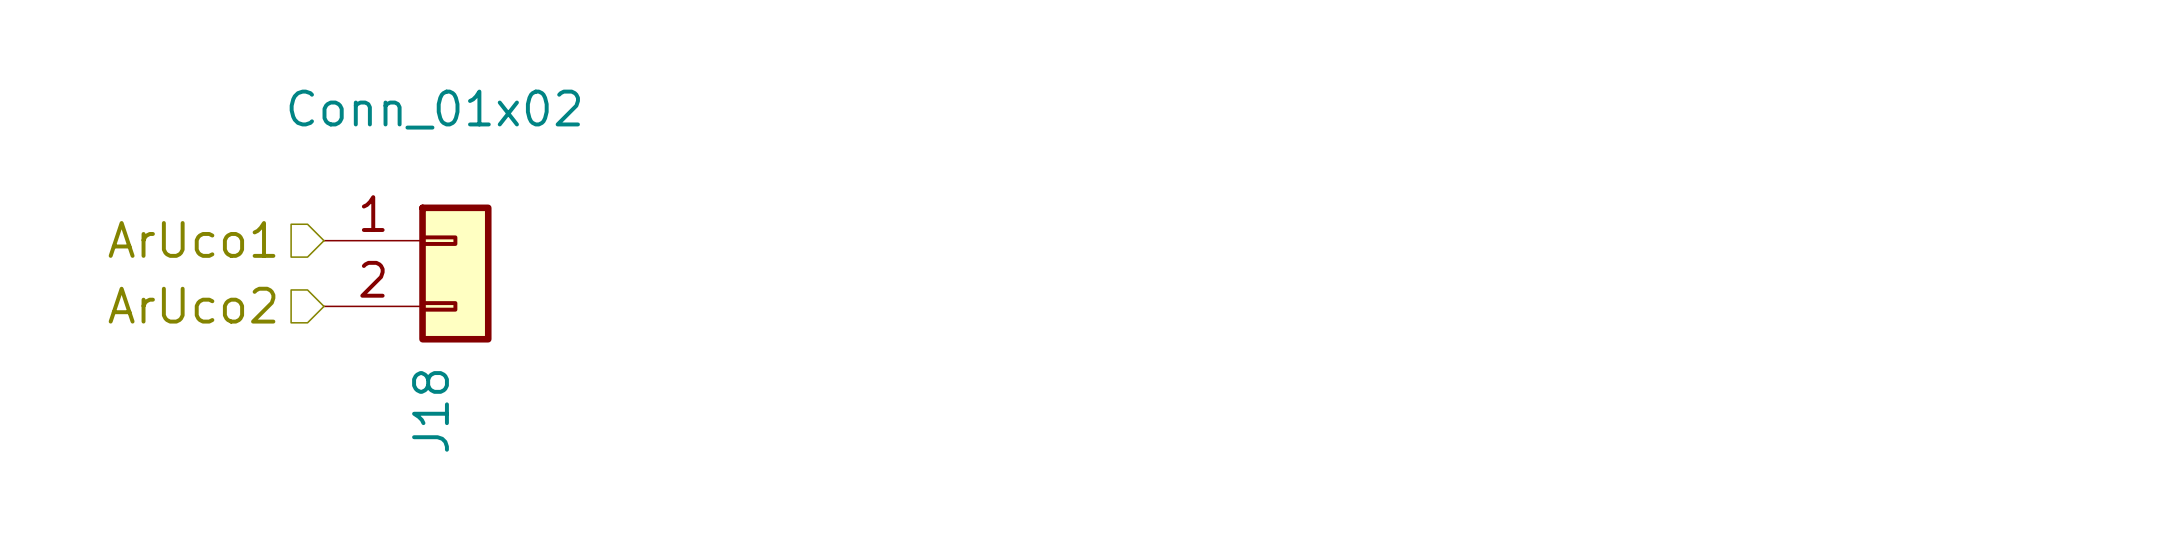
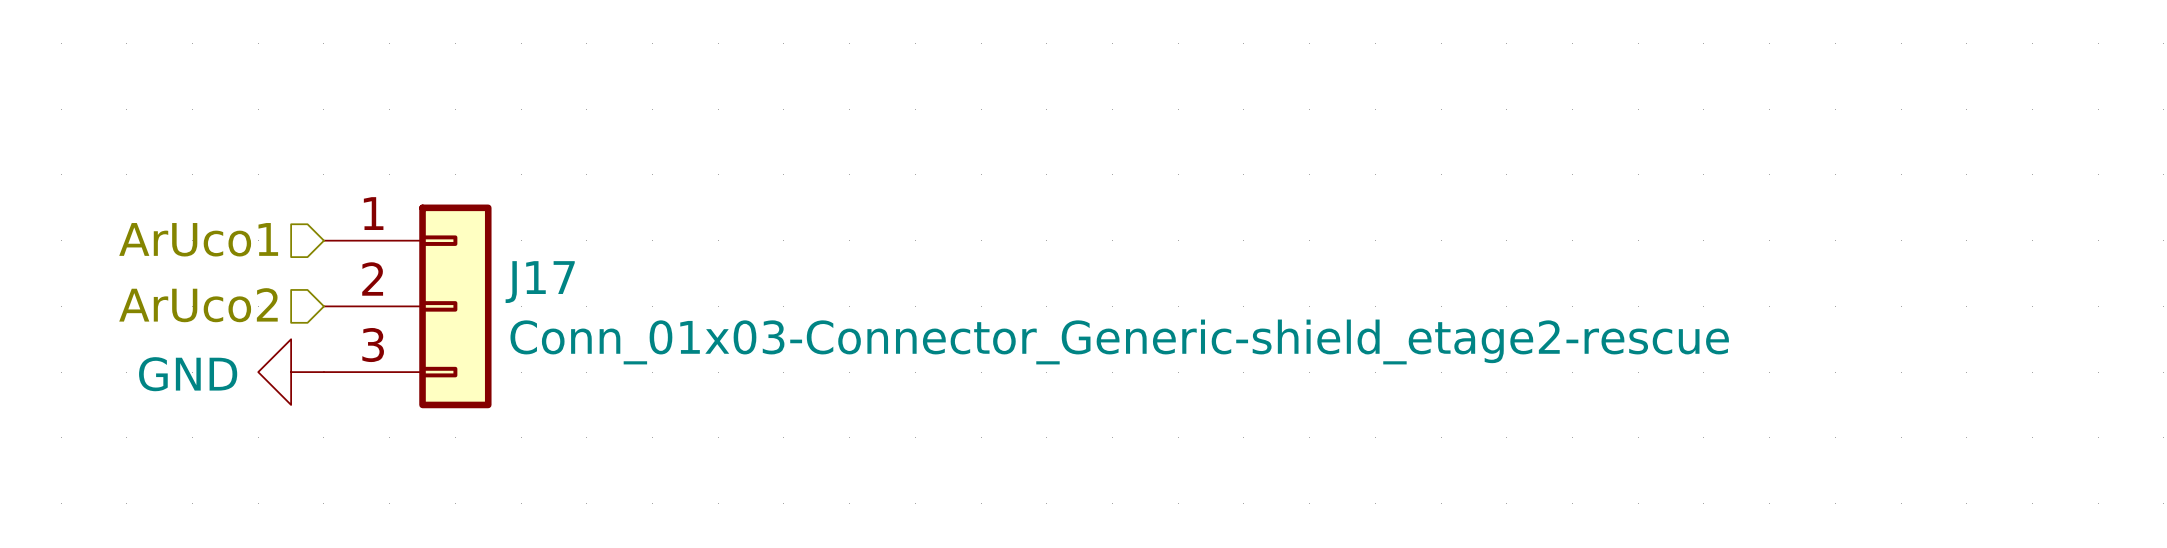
J18: Conn_01x02 (407, 273) -> none
J17: none -> Conn_01x03-Connector_Generic-shield_etage2-rescue (407, 306)
power symbol: none -> GND (291, 372)

